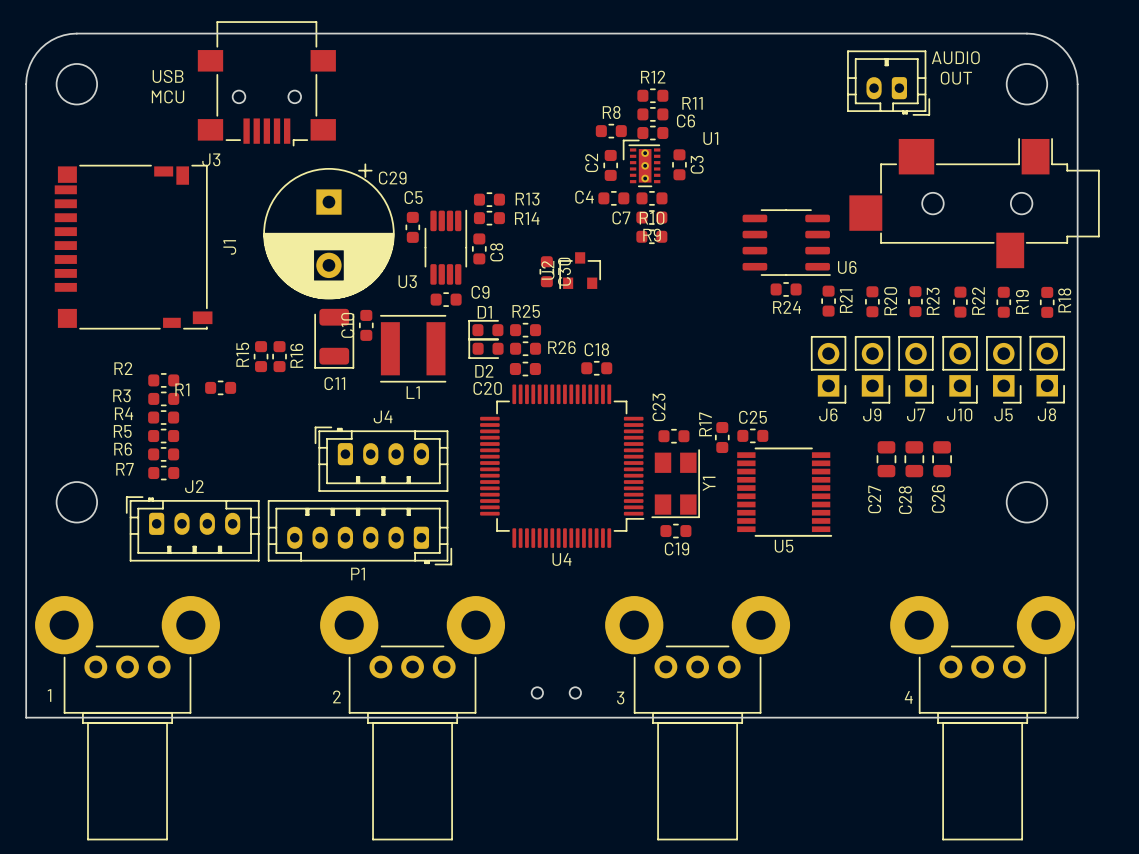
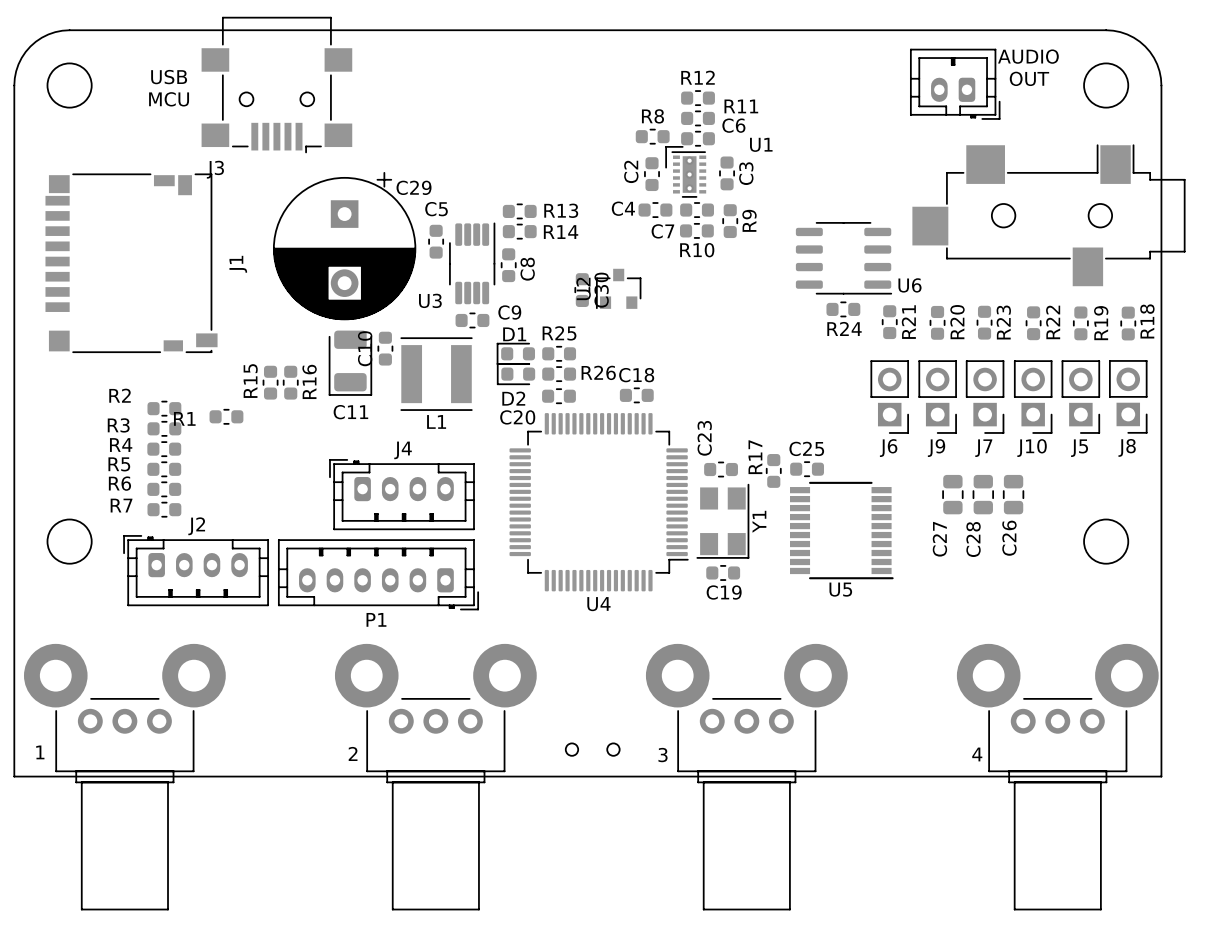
R9: none -> (730, 221)
R9 name: R9 (652, 235) -> R10 (697, 250)
R10: (651, 236) -> none

